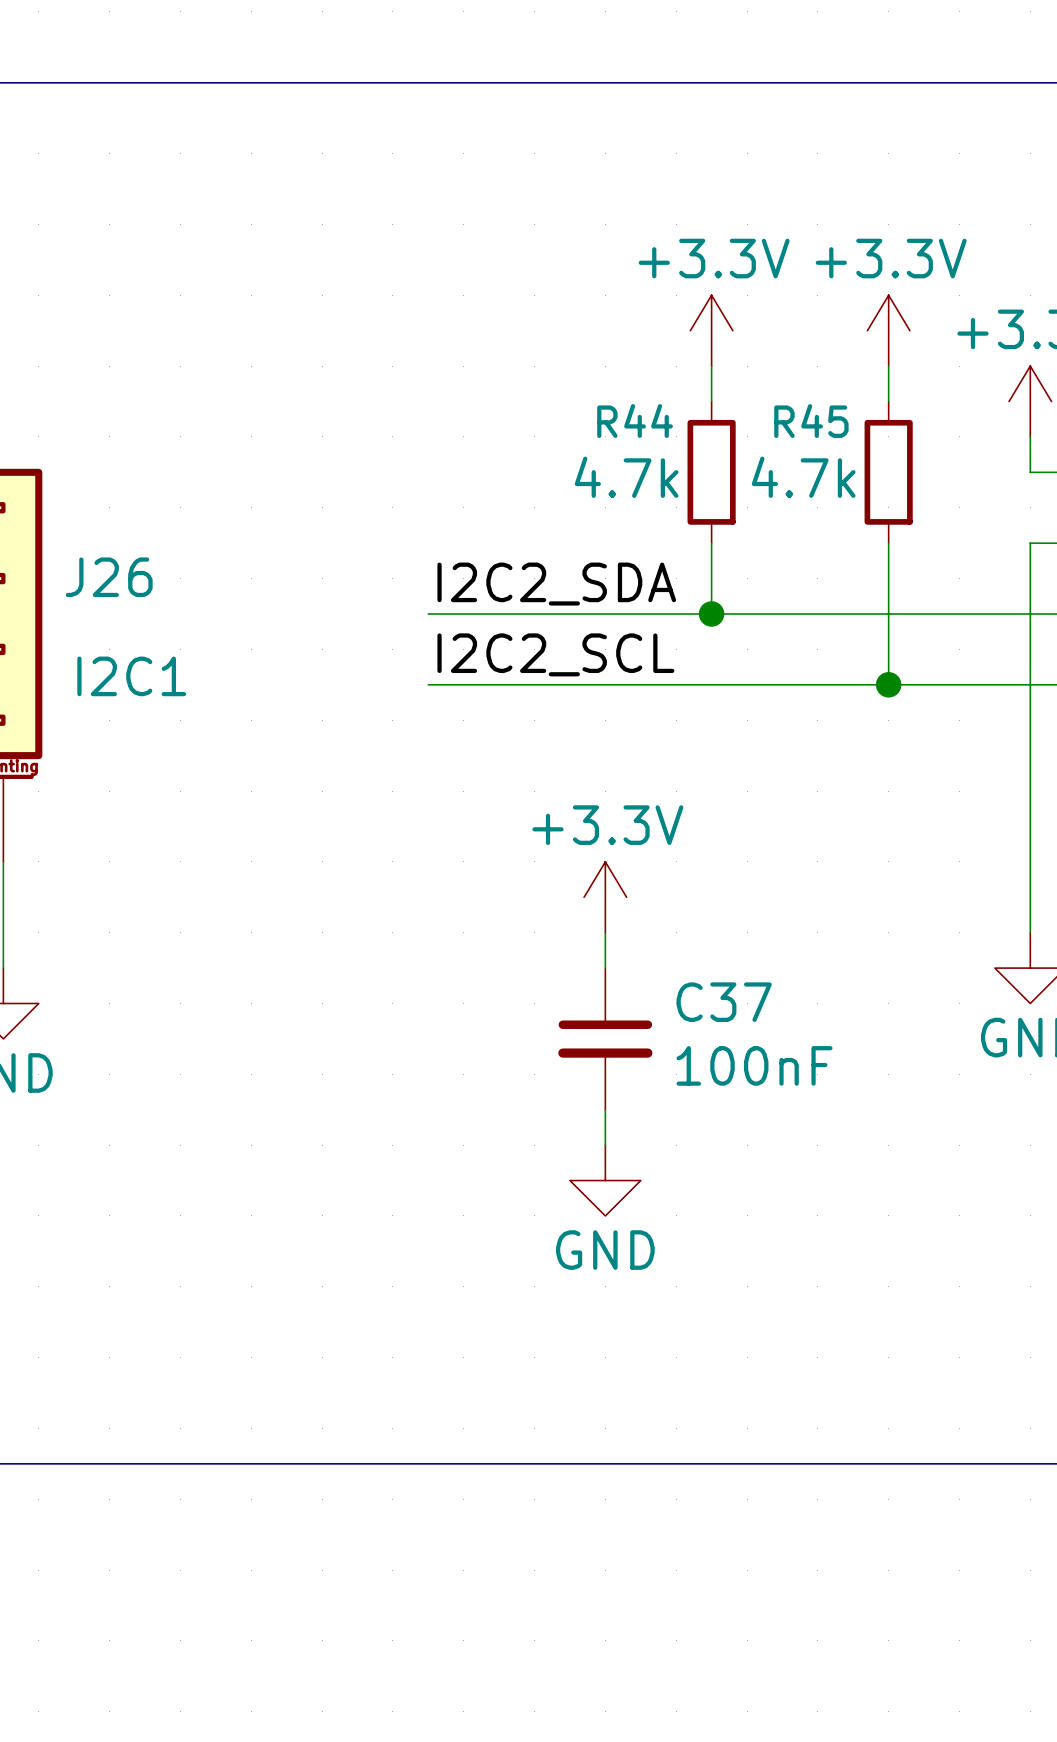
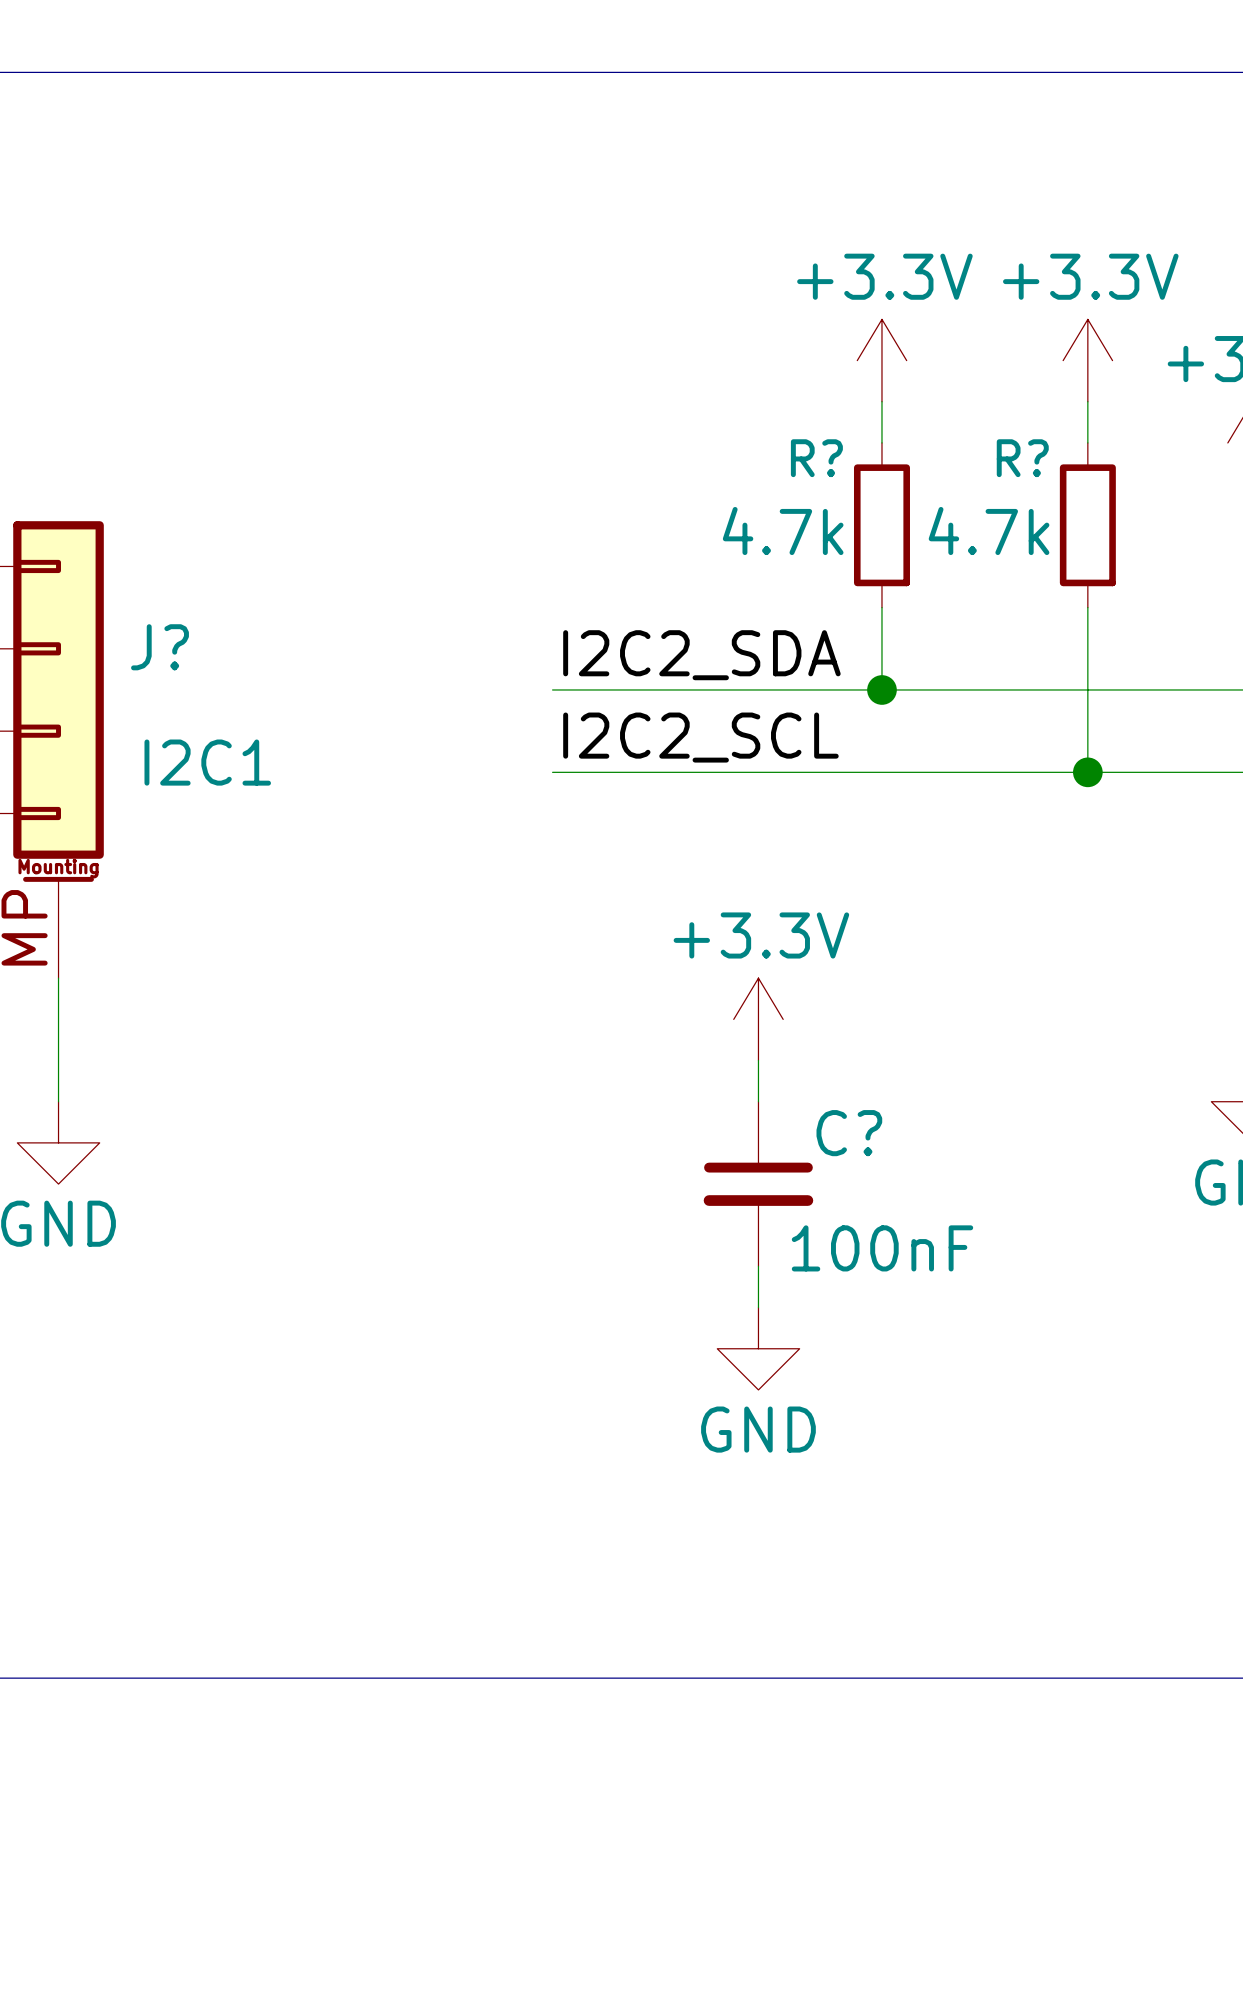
R44 name: R44 (635, 421) -> R? (816, 458)
R45 name: R45 (811, 421) -> R? (1022, 458)
J26 name: J26 (109, 577) -> J? (160, 647)
C37 name: C37 (724, 1002) -> C? (849, 1133)
C37 value position: 100nF (754, 1065) -> 100nF (882, 1248)

